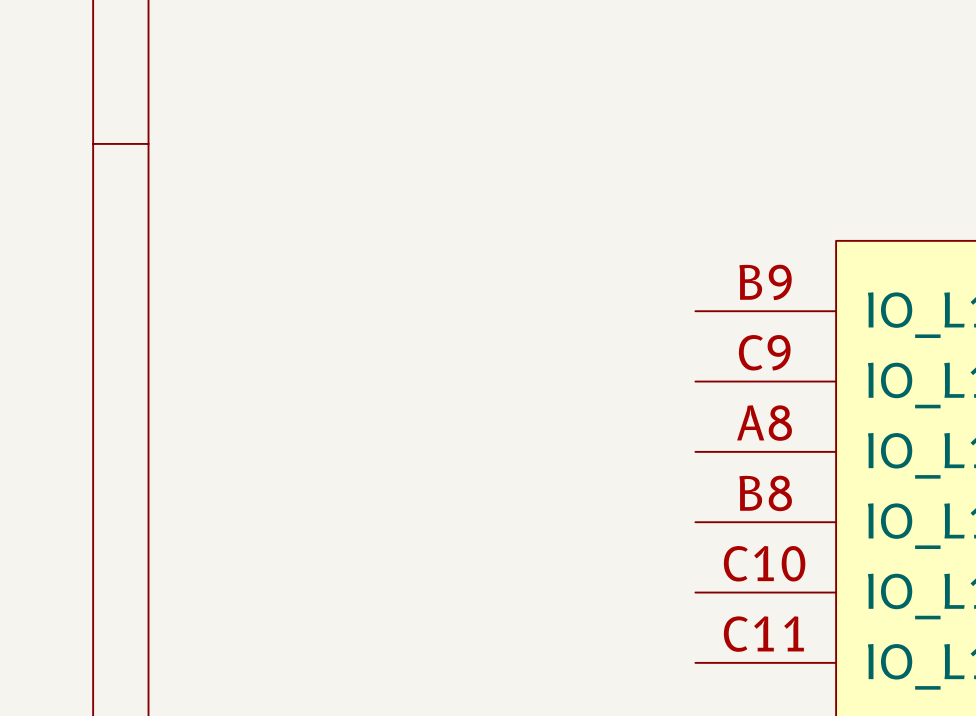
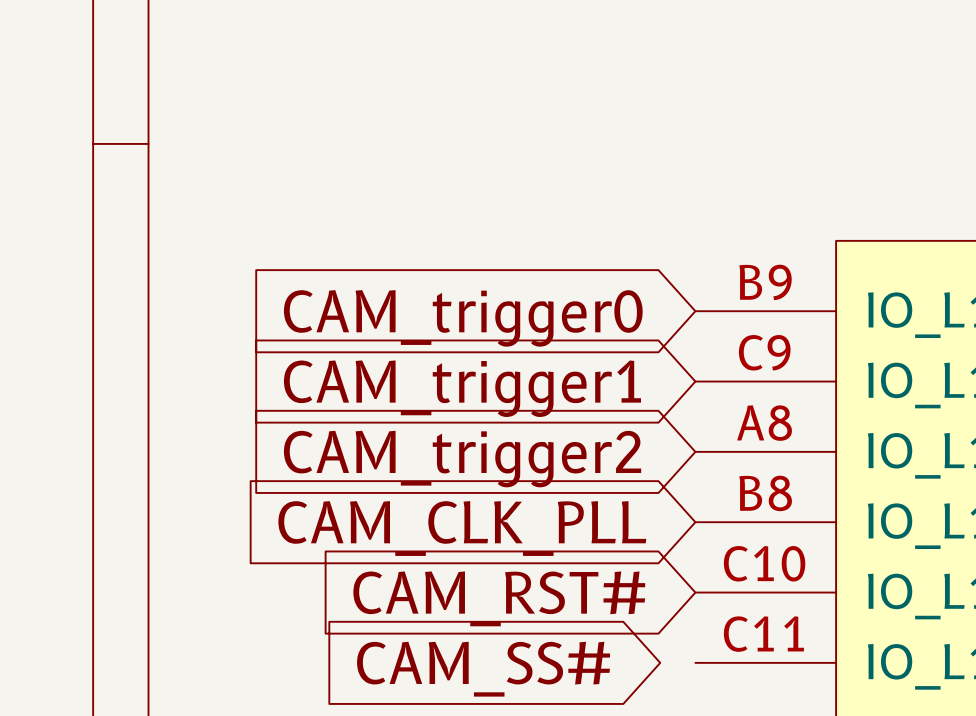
global label: none -> CAM_trigger0 (463, 318)
global label: none -> CAM_trigger1 (462, 388)
global label: none -> CAM_trigger2 (462, 459)
global label: none -> CAM_CLK_PLL (462, 528)
global label: none -> CAM_RST# (499, 598)
global label: none -> CAM_SS# (483, 669)

